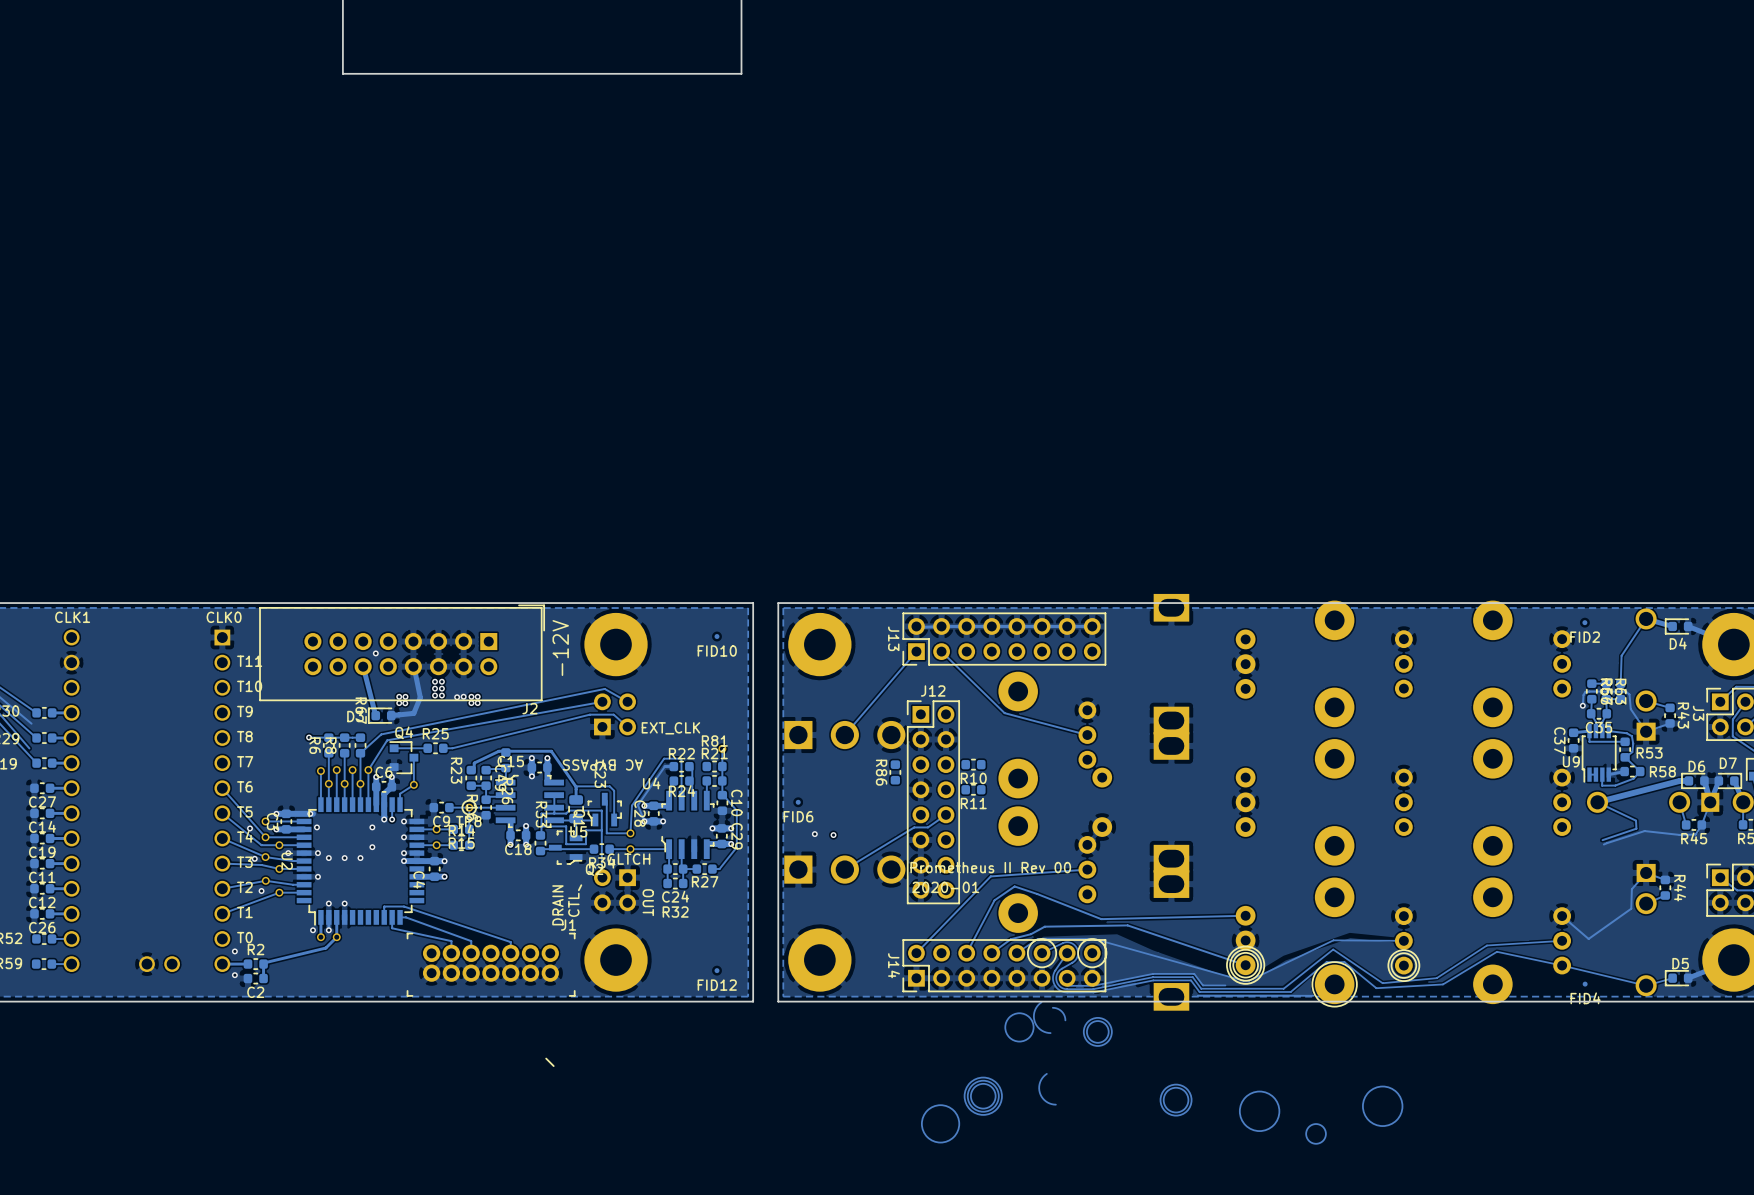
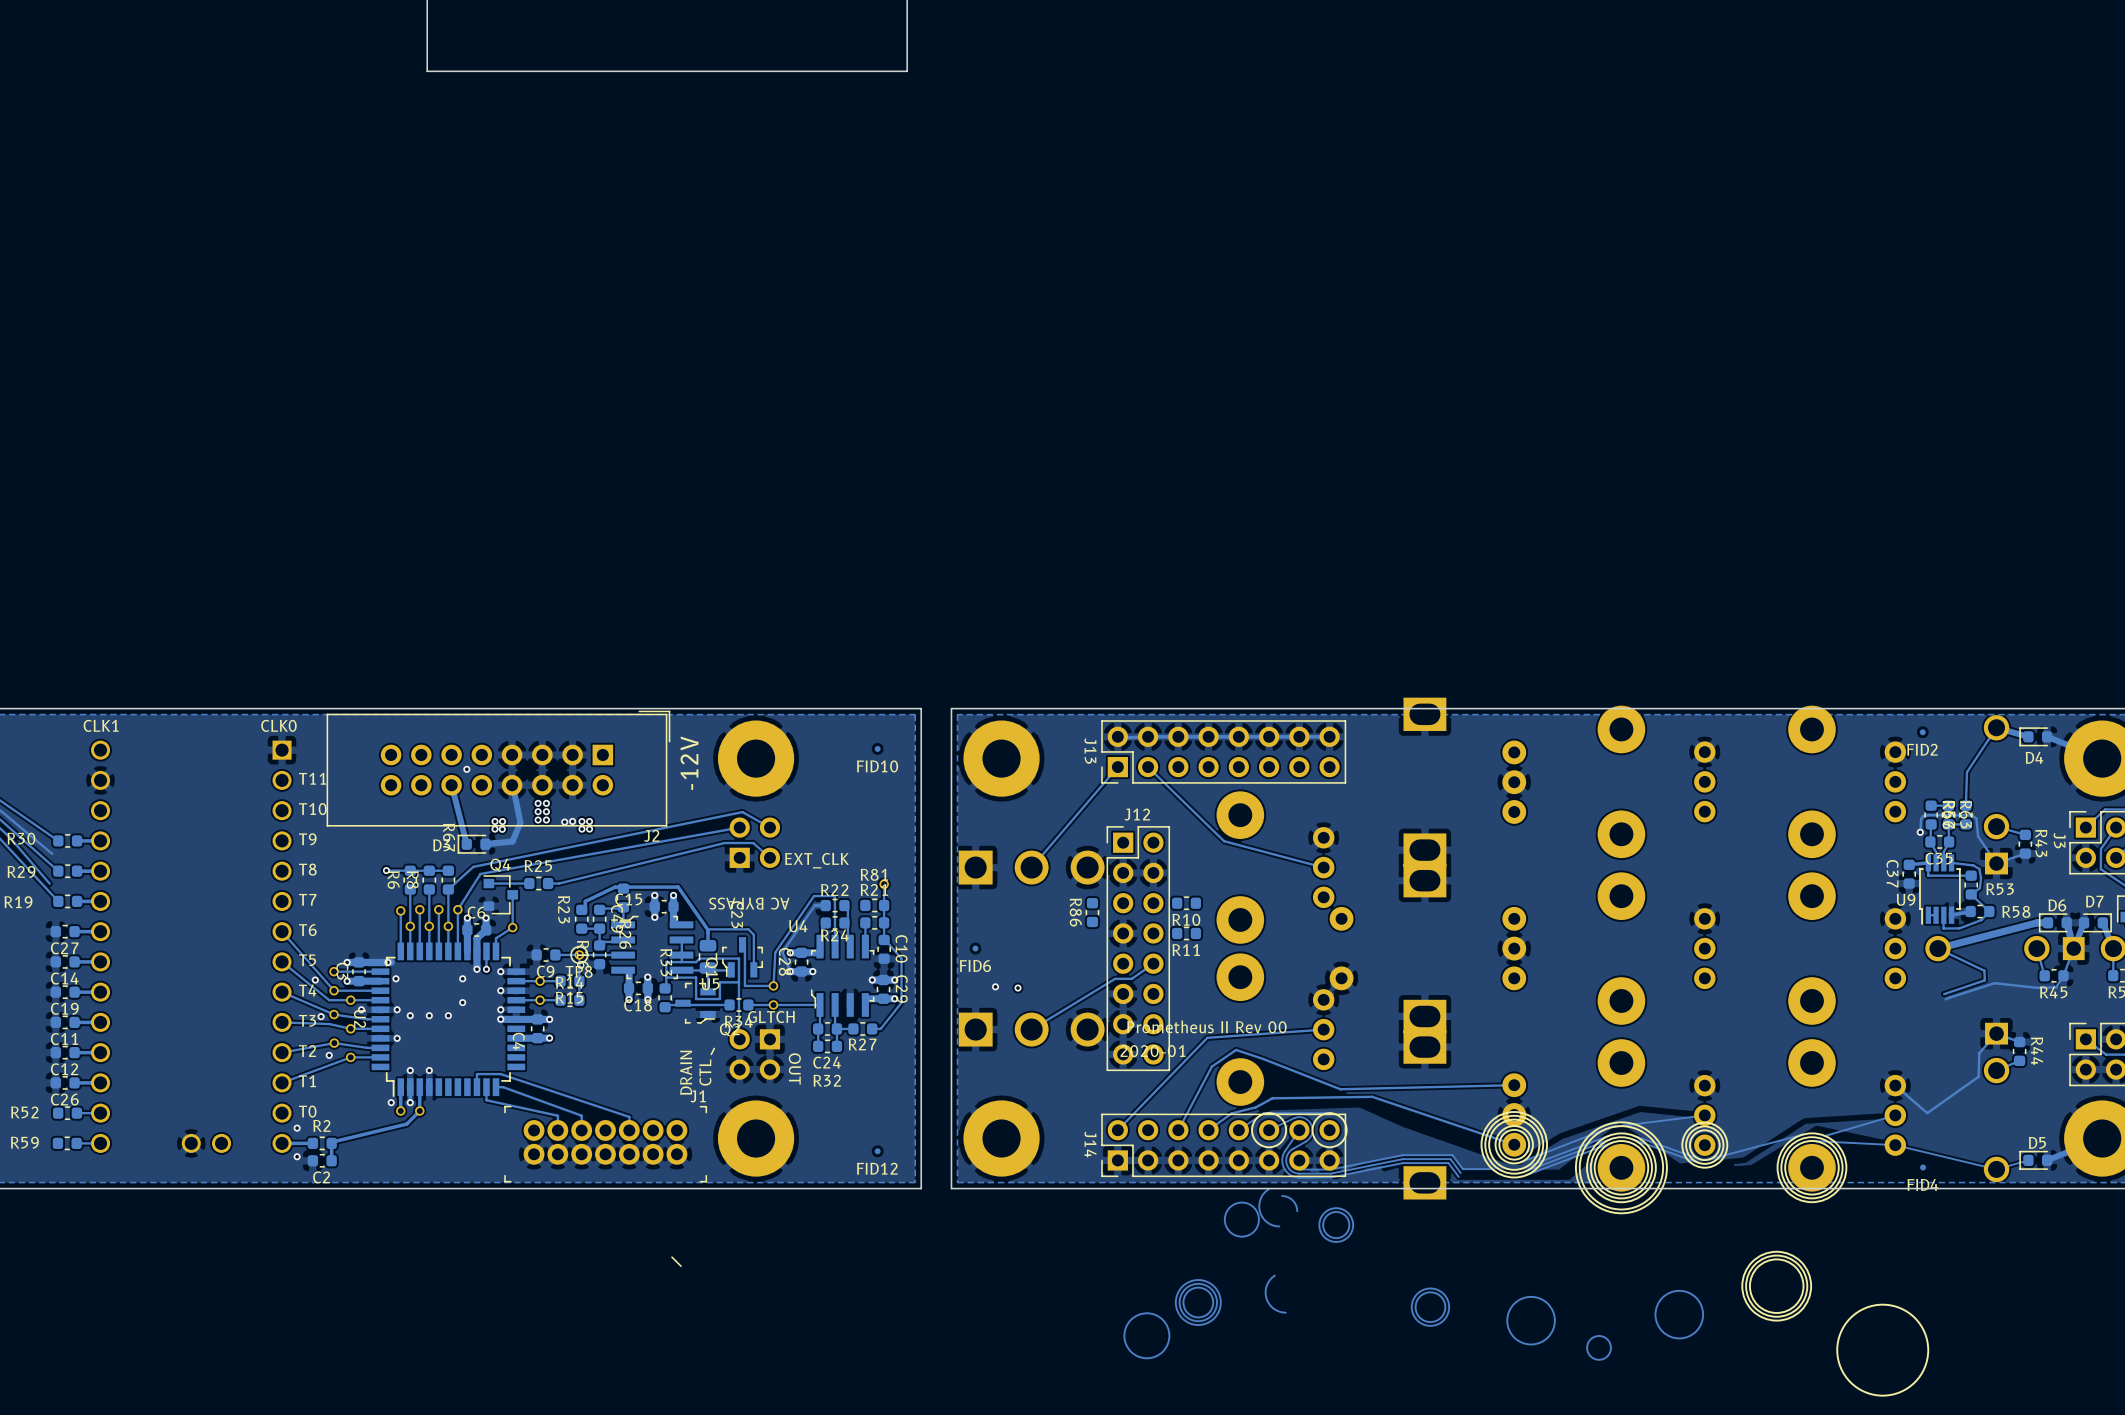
drawing: none -> [1480, 1111, 1548, 1179]
track: (1094, 938) (1243, 980) (1249, 980) (1333, 940) (1403, 940) -> (1614, 1126) (1704, 1115)
track: (1562, 940) (1486, 945) (1436, 978) (1382, 983) (1333, 949) (1283, 988) (1201, 988) -> (1895, 1115) (1824, 1136)
drawing: none -> [1574, 1121, 1668, 1215]
track: none -> (1606, 1128) (1521, 1162)
drawing: none -> [1776, 1132, 1848, 1204]
track: none -> (1803, 1134) (1708, 1159)
track: none -> (1609, 1135) (1523, 1168)
track: none -> (1632, 1135) (1699, 1159)
track: none -> (1610, 1139) (1524, 1171)
track: none -> (1631, 1138) (1698, 1162)
track: none -> (1611, 1142) (1525, 1175)
drawing position: (1245, 965) -> (1704, 1145)
track: (1562, 965) (1497, 951) (1442, 984) (1376, 988) (1344, 962) (1326, 962) (1290, 991) (1199, 991) -> (1895, 1145) (1812, 1140)
track: (1313, 995) (1197, 995) -> none
drawing: none -> [1741, 1250, 1813, 1322]
drawing: none -> [1836, 1303, 1930, 1397]

